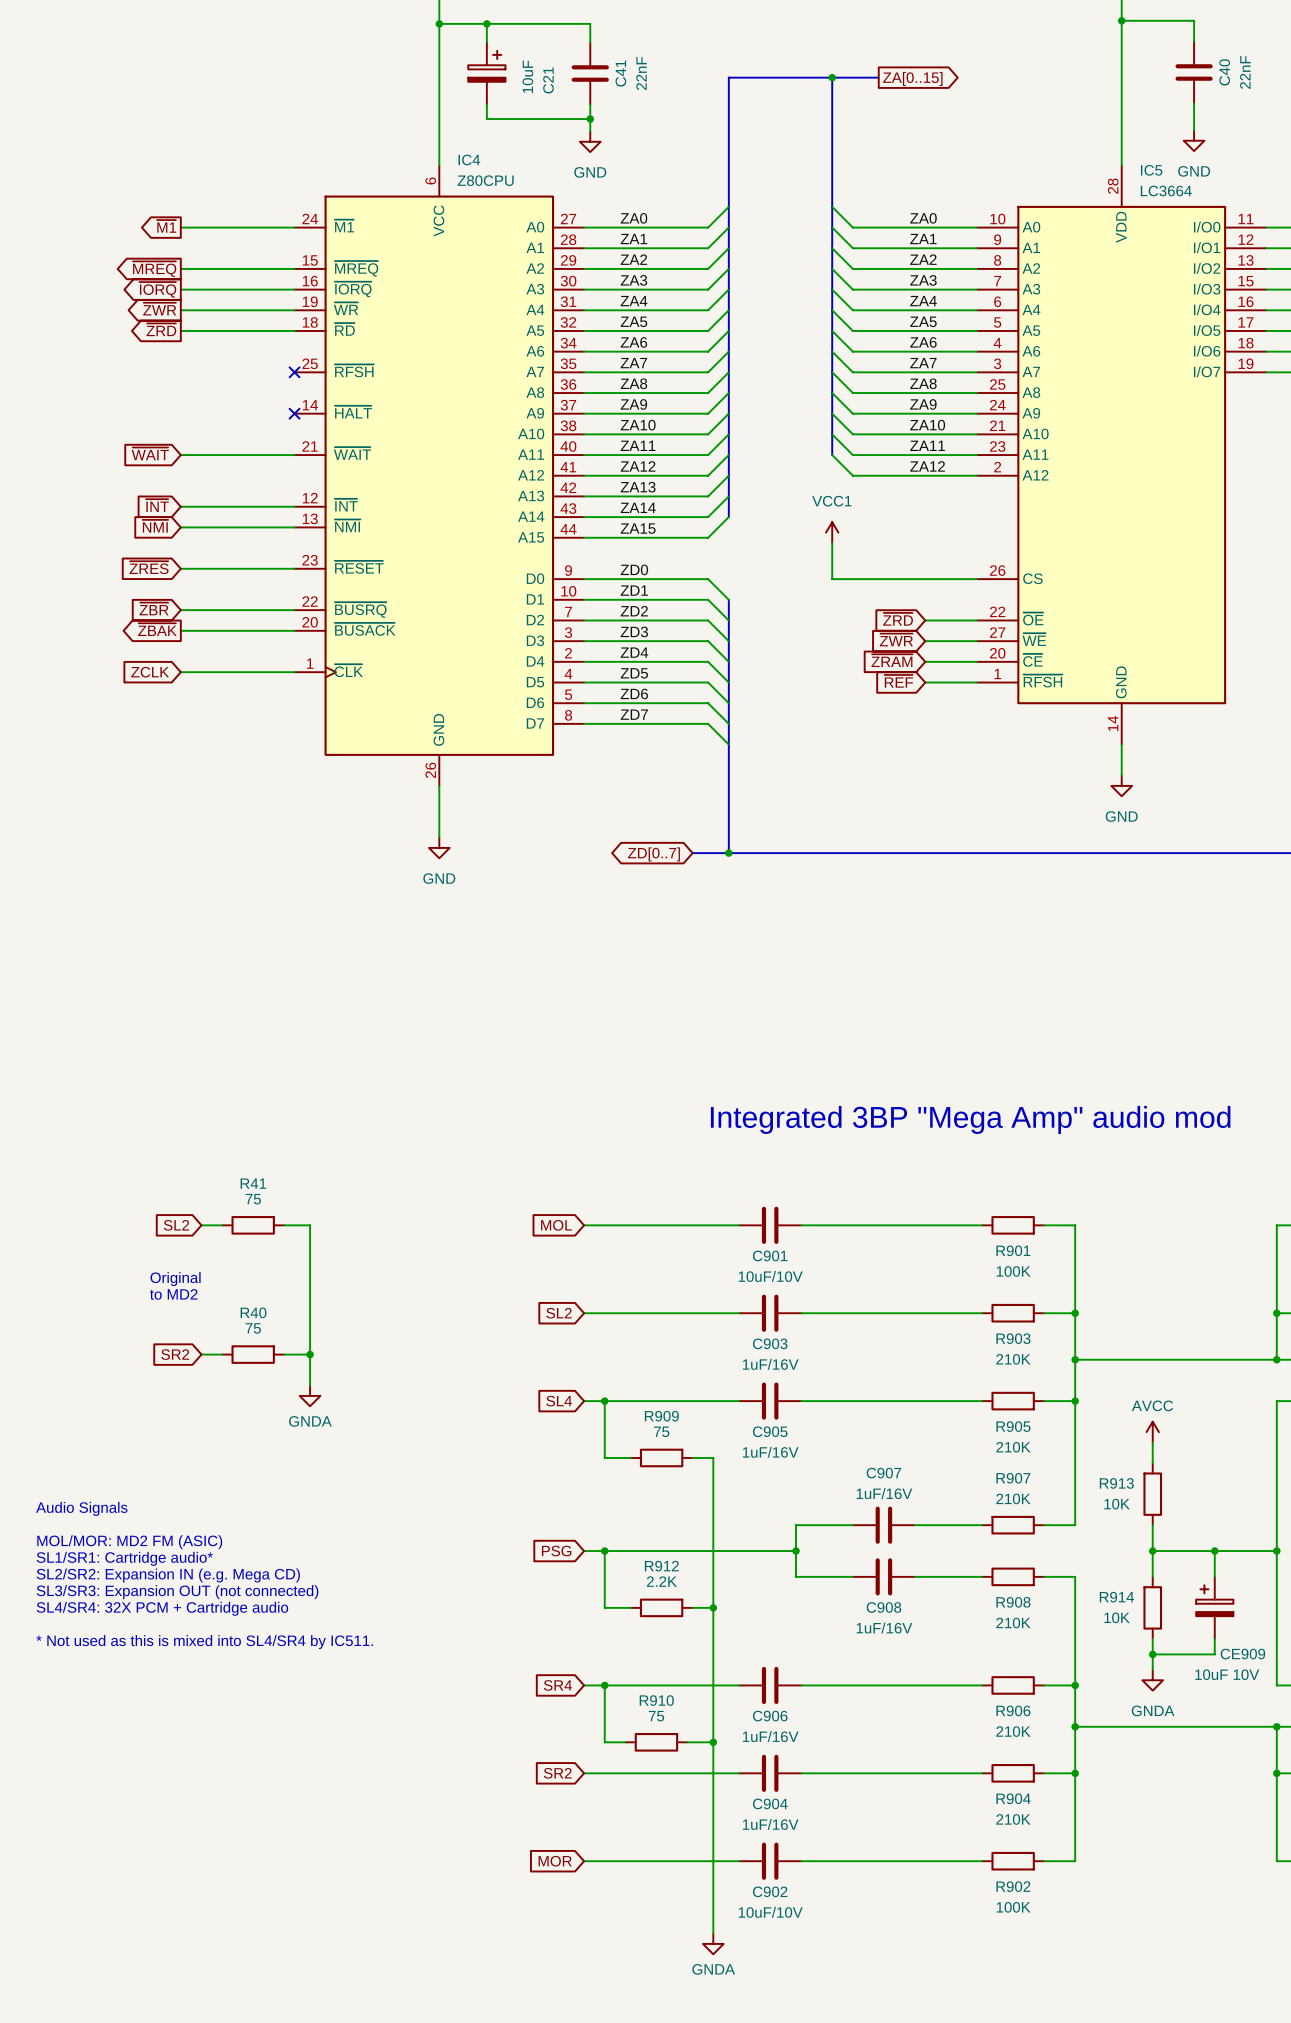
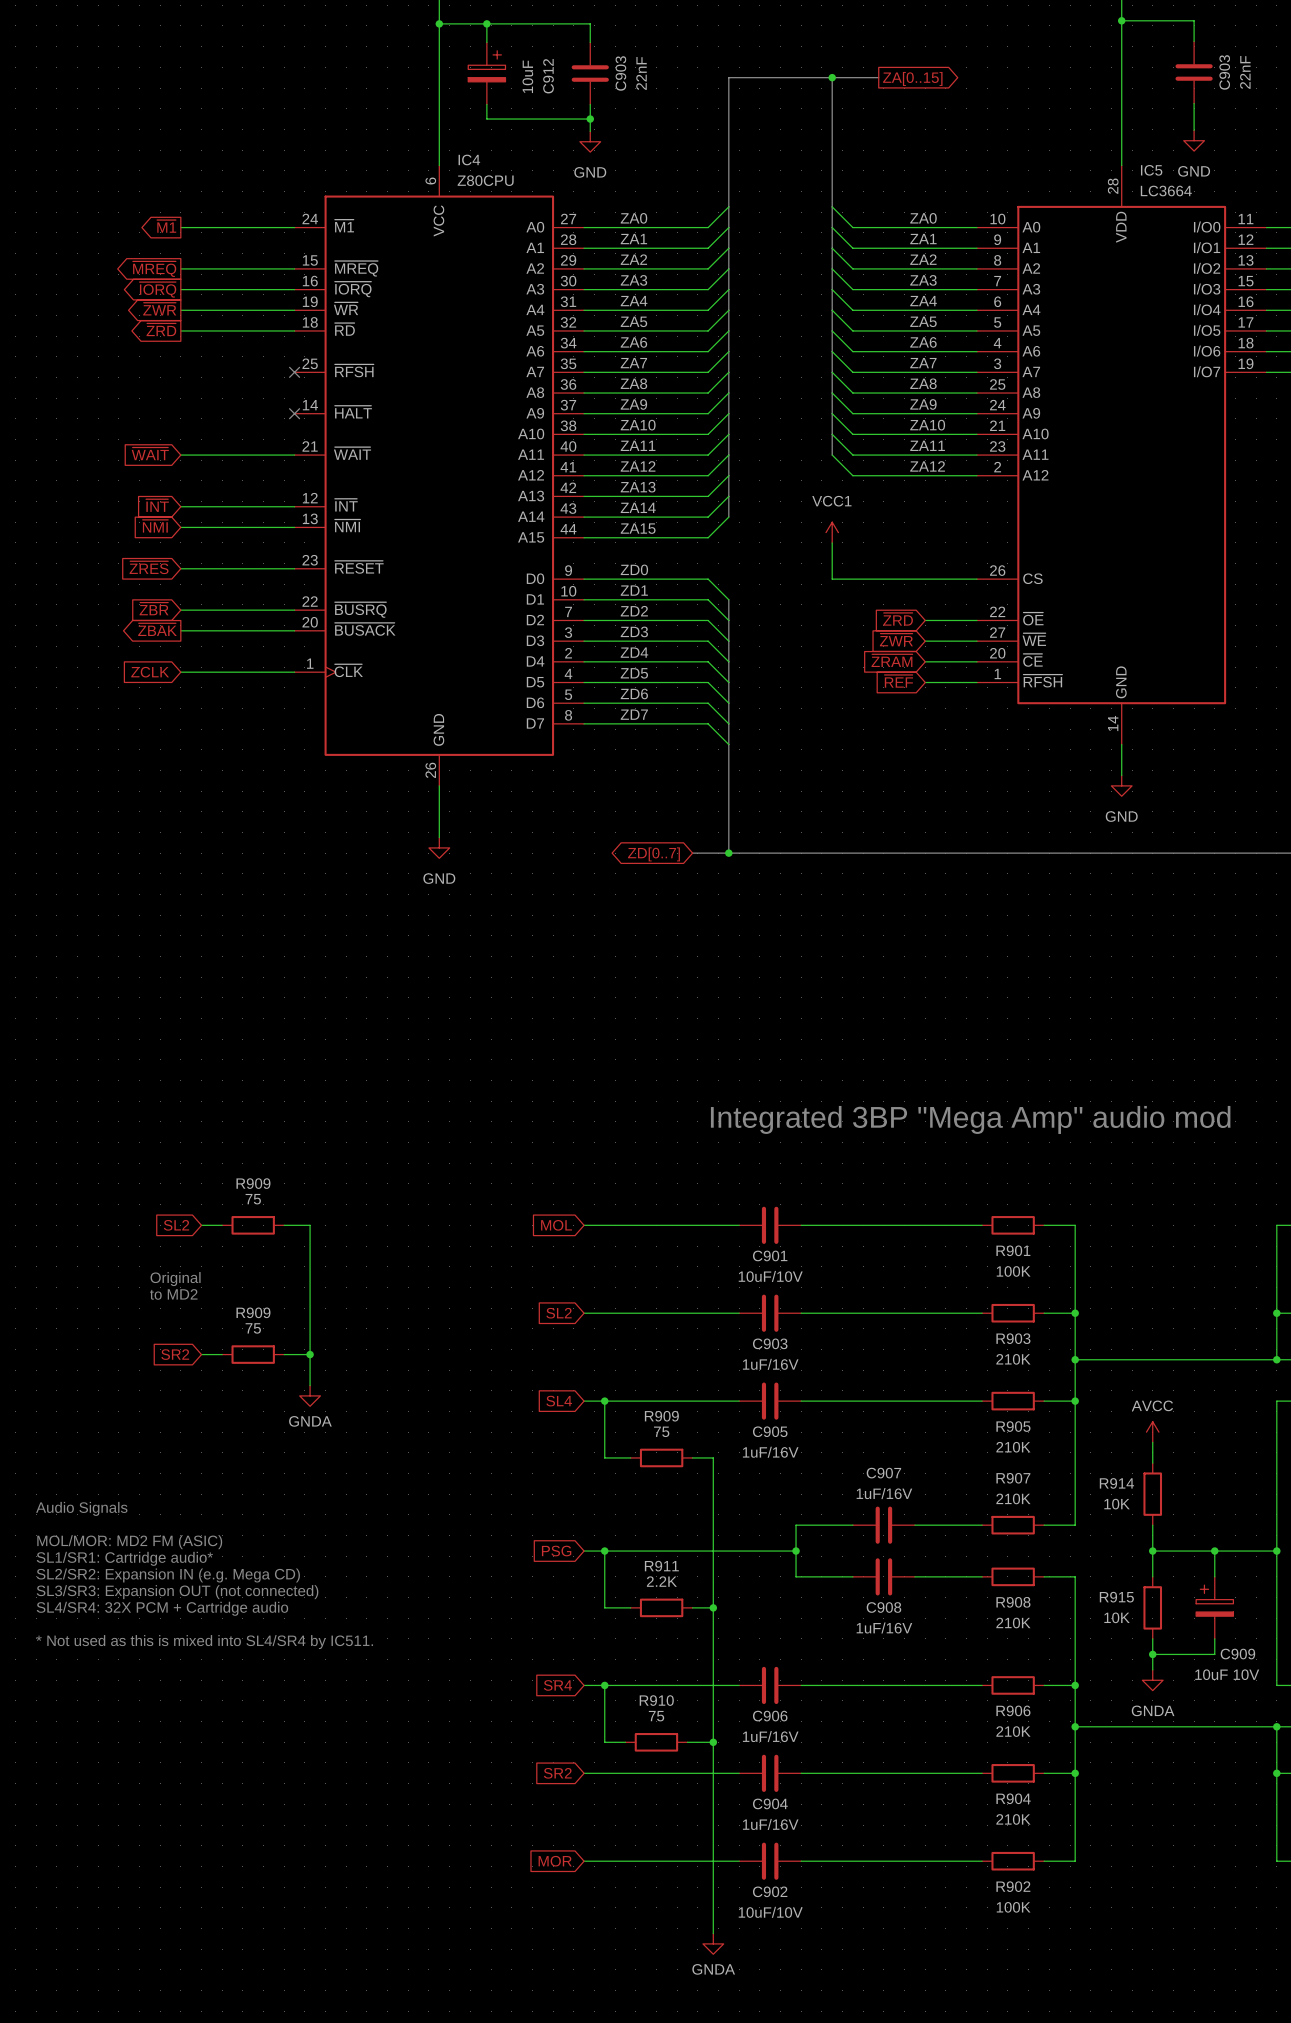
C40 name: C40 (1224, 72) -> C903 (1224, 72)
C41 name: C41 (620, 73) -> C903 (620, 73)
C21 name: C21 (548, 80) -> C912 (548, 76)
R41 name: R41 (253, 1183) -> R909 (253, 1183)
R40 name: R40 (253, 1312) -> R909 (253, 1312)
R913 name: R913 (1116, 1483) -> R914 (1116, 1483)
R912 name: R912 (661, 1566) -> R911 (661, 1566)
R914 name: R914 (1116, 1597) -> R915 (1116, 1597)
CE909 name: CE909 (1242, 1654) -> C909 (1237, 1654)

